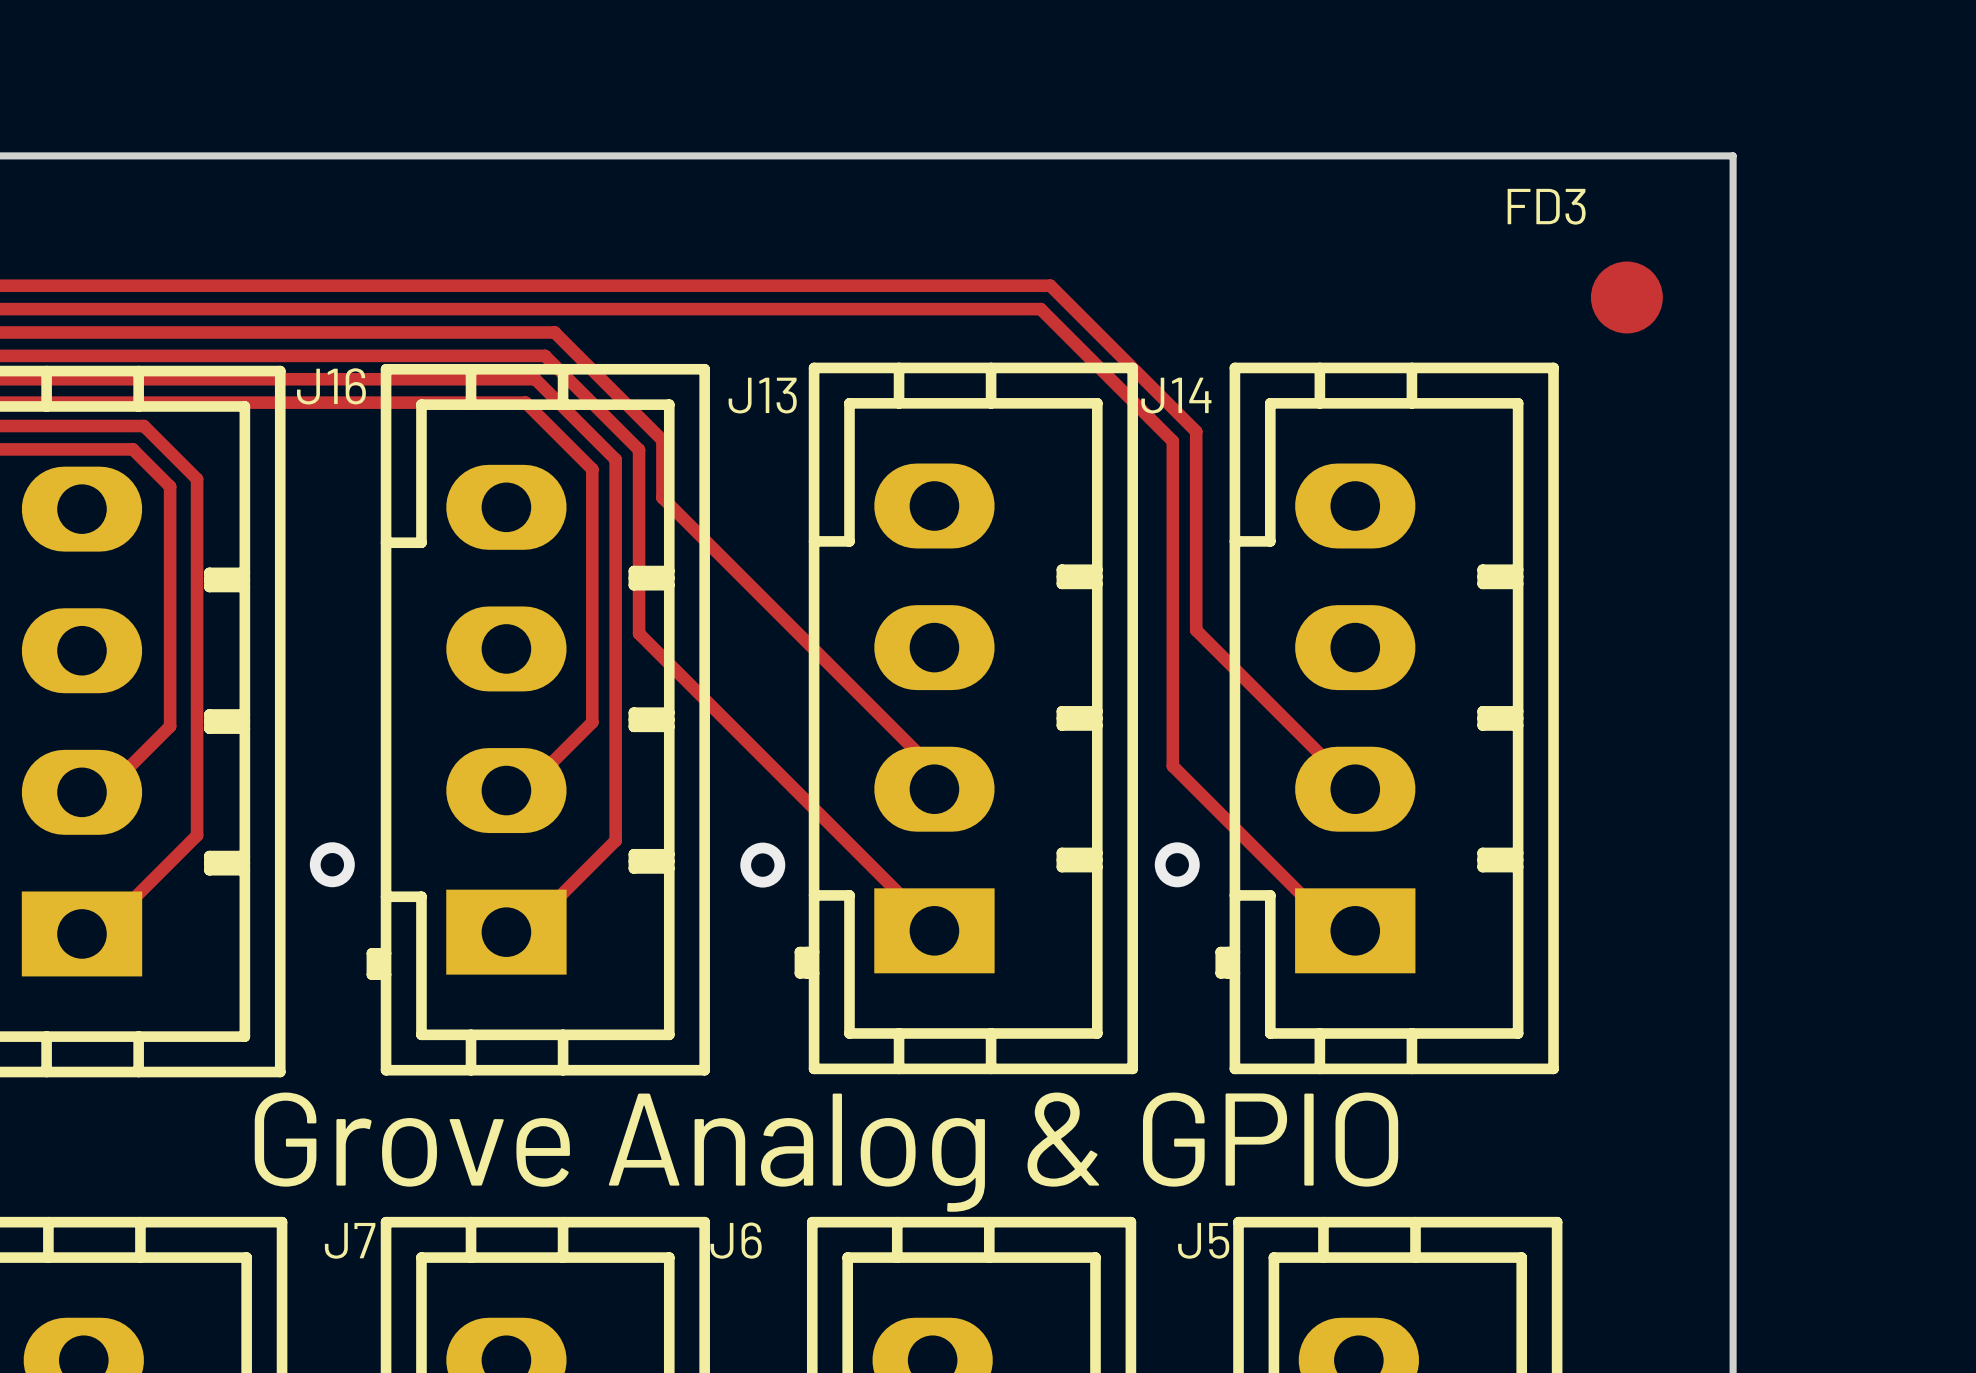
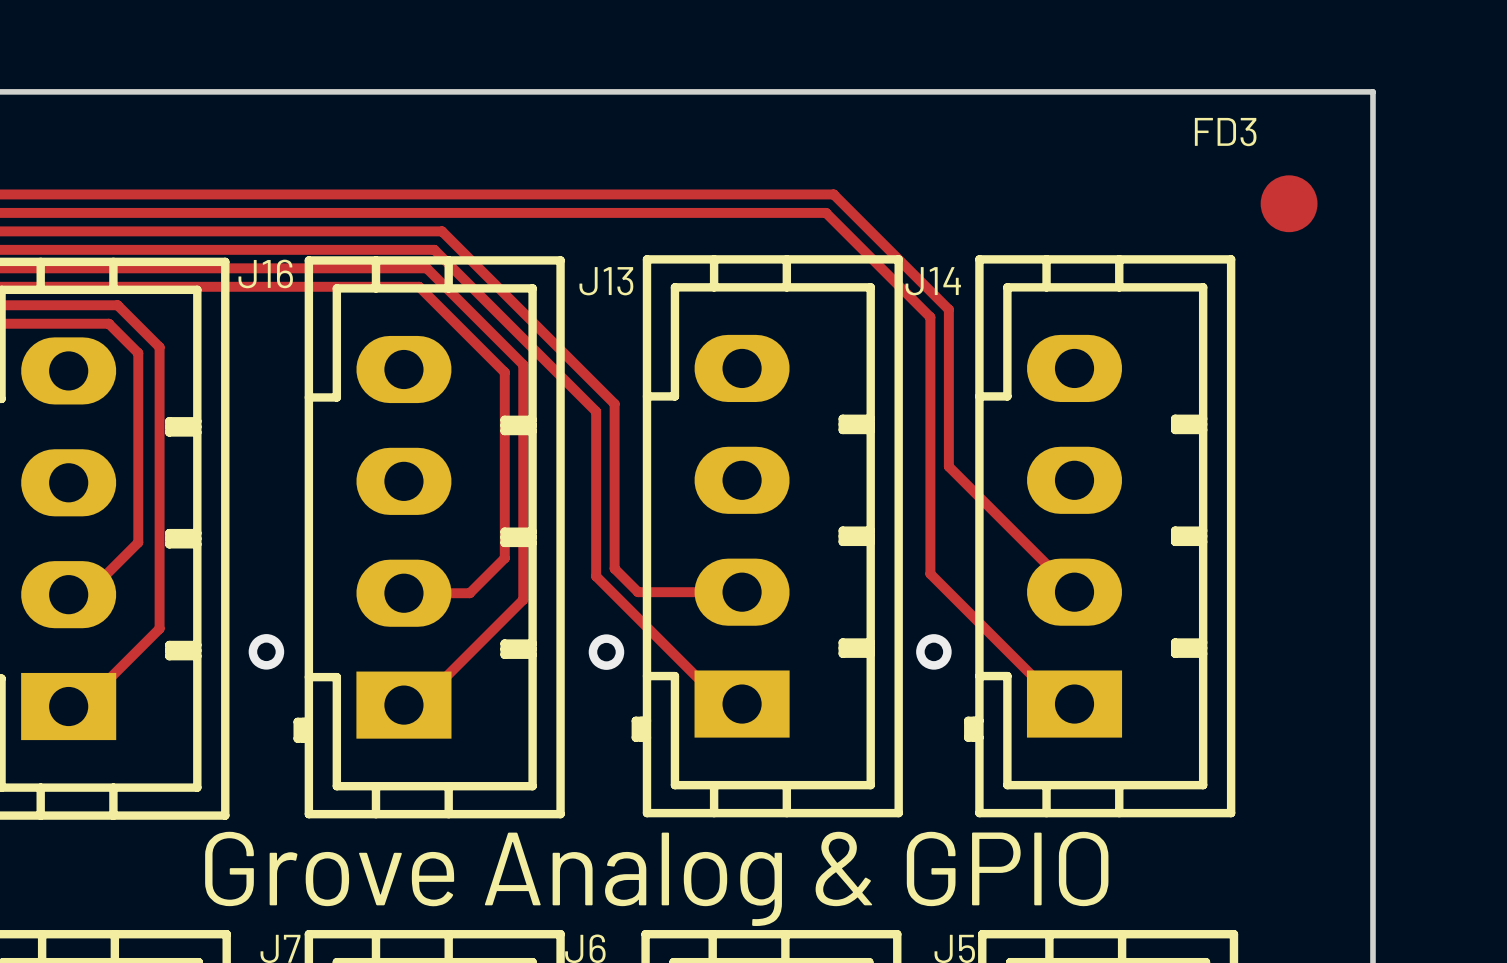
track: (662, 440) (662, 497) (953, 789) -> (527, 316) (614, 403) (614, 568) (638, 592) (757, 592)
track: (639, 449) (639, 633) (936, 930) -> (508, 324) (596, 411) (596, 576) (723, 704) (743, 704)
track: (615, 459) (615, 840) -> (490, 331) (523, 364) (523, 599) (490, 632)
track: (592, 469) (592, 722) (524, 790) -> (471, 339) (504, 372) (504, 558) (469, 593) (417, 593)

